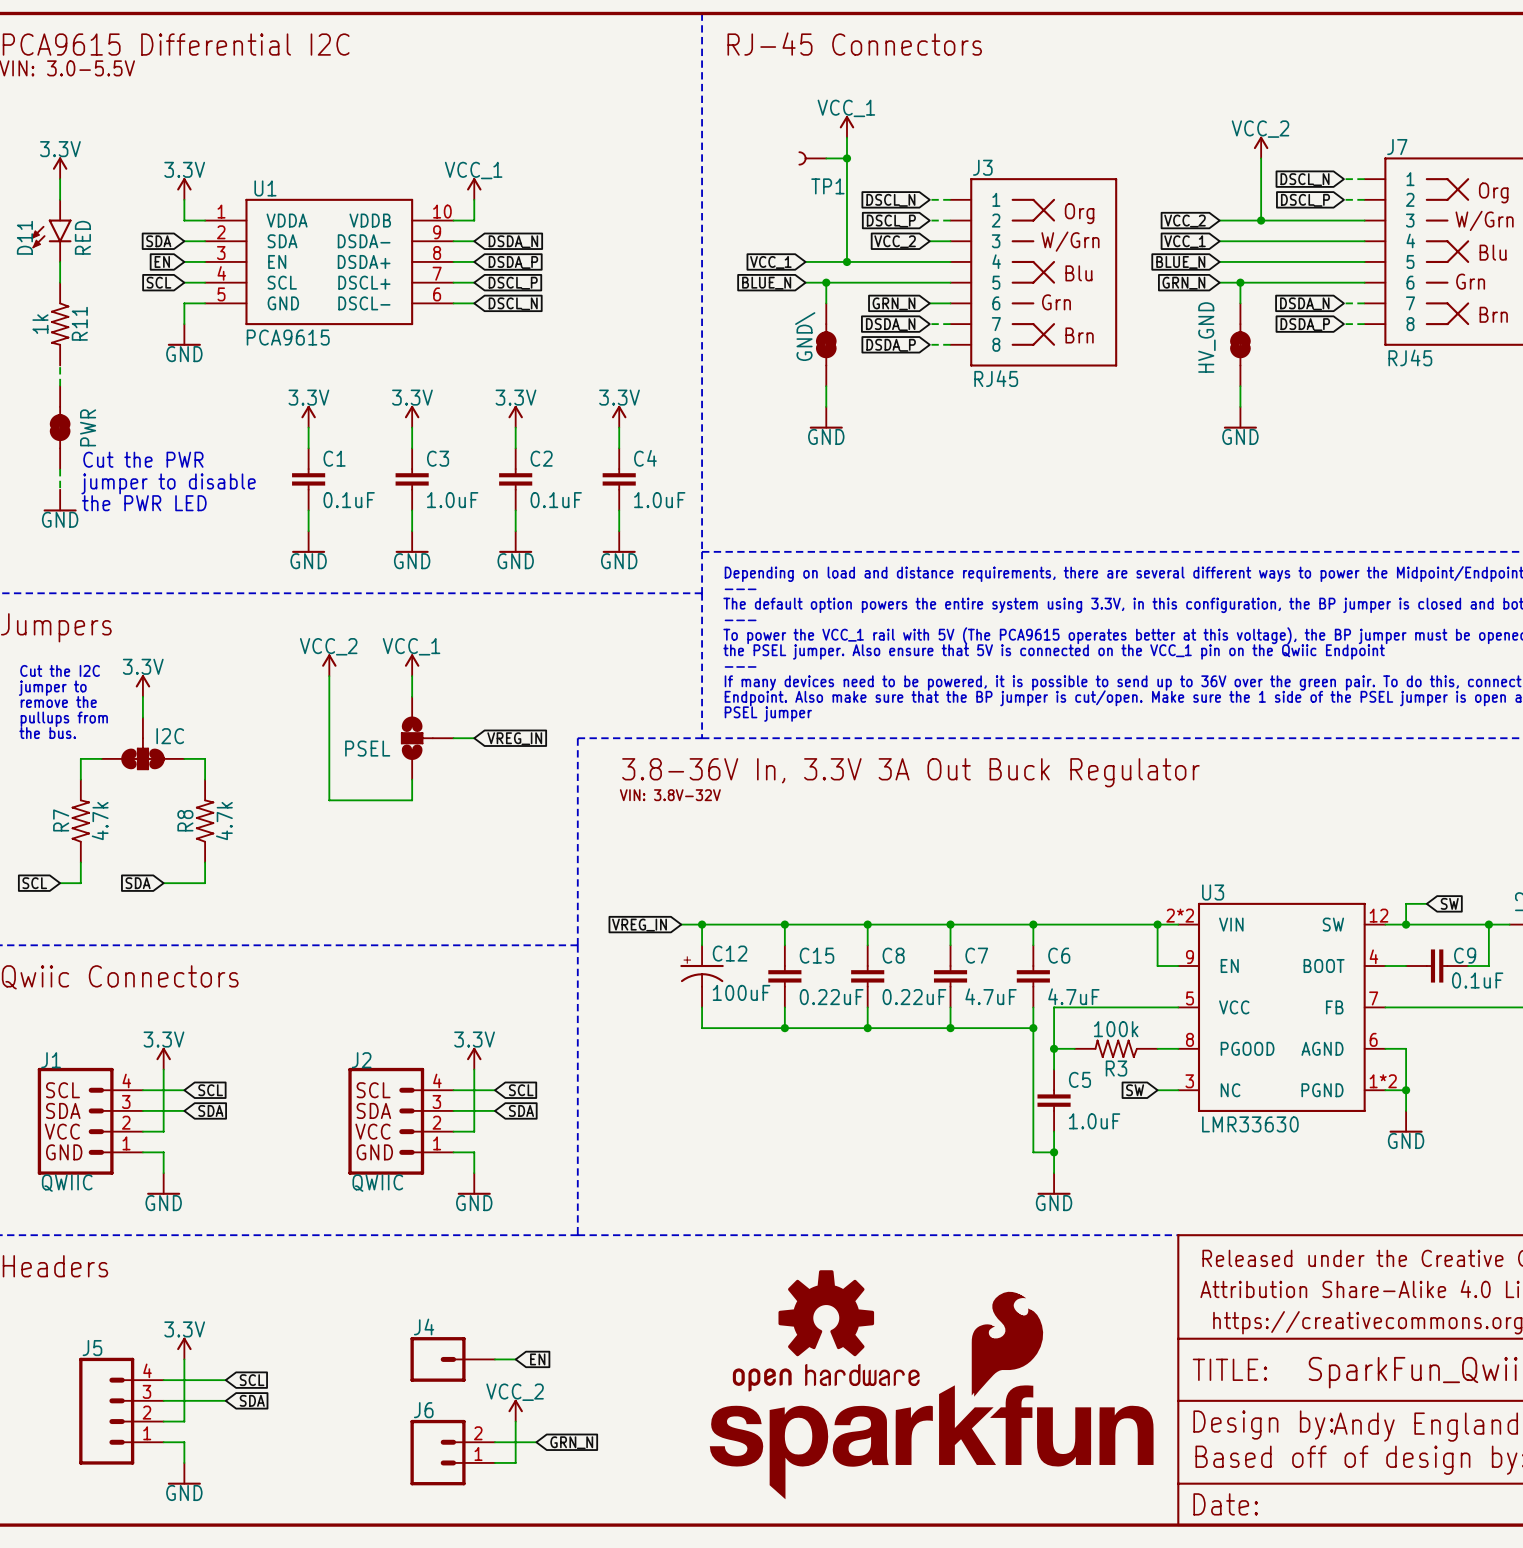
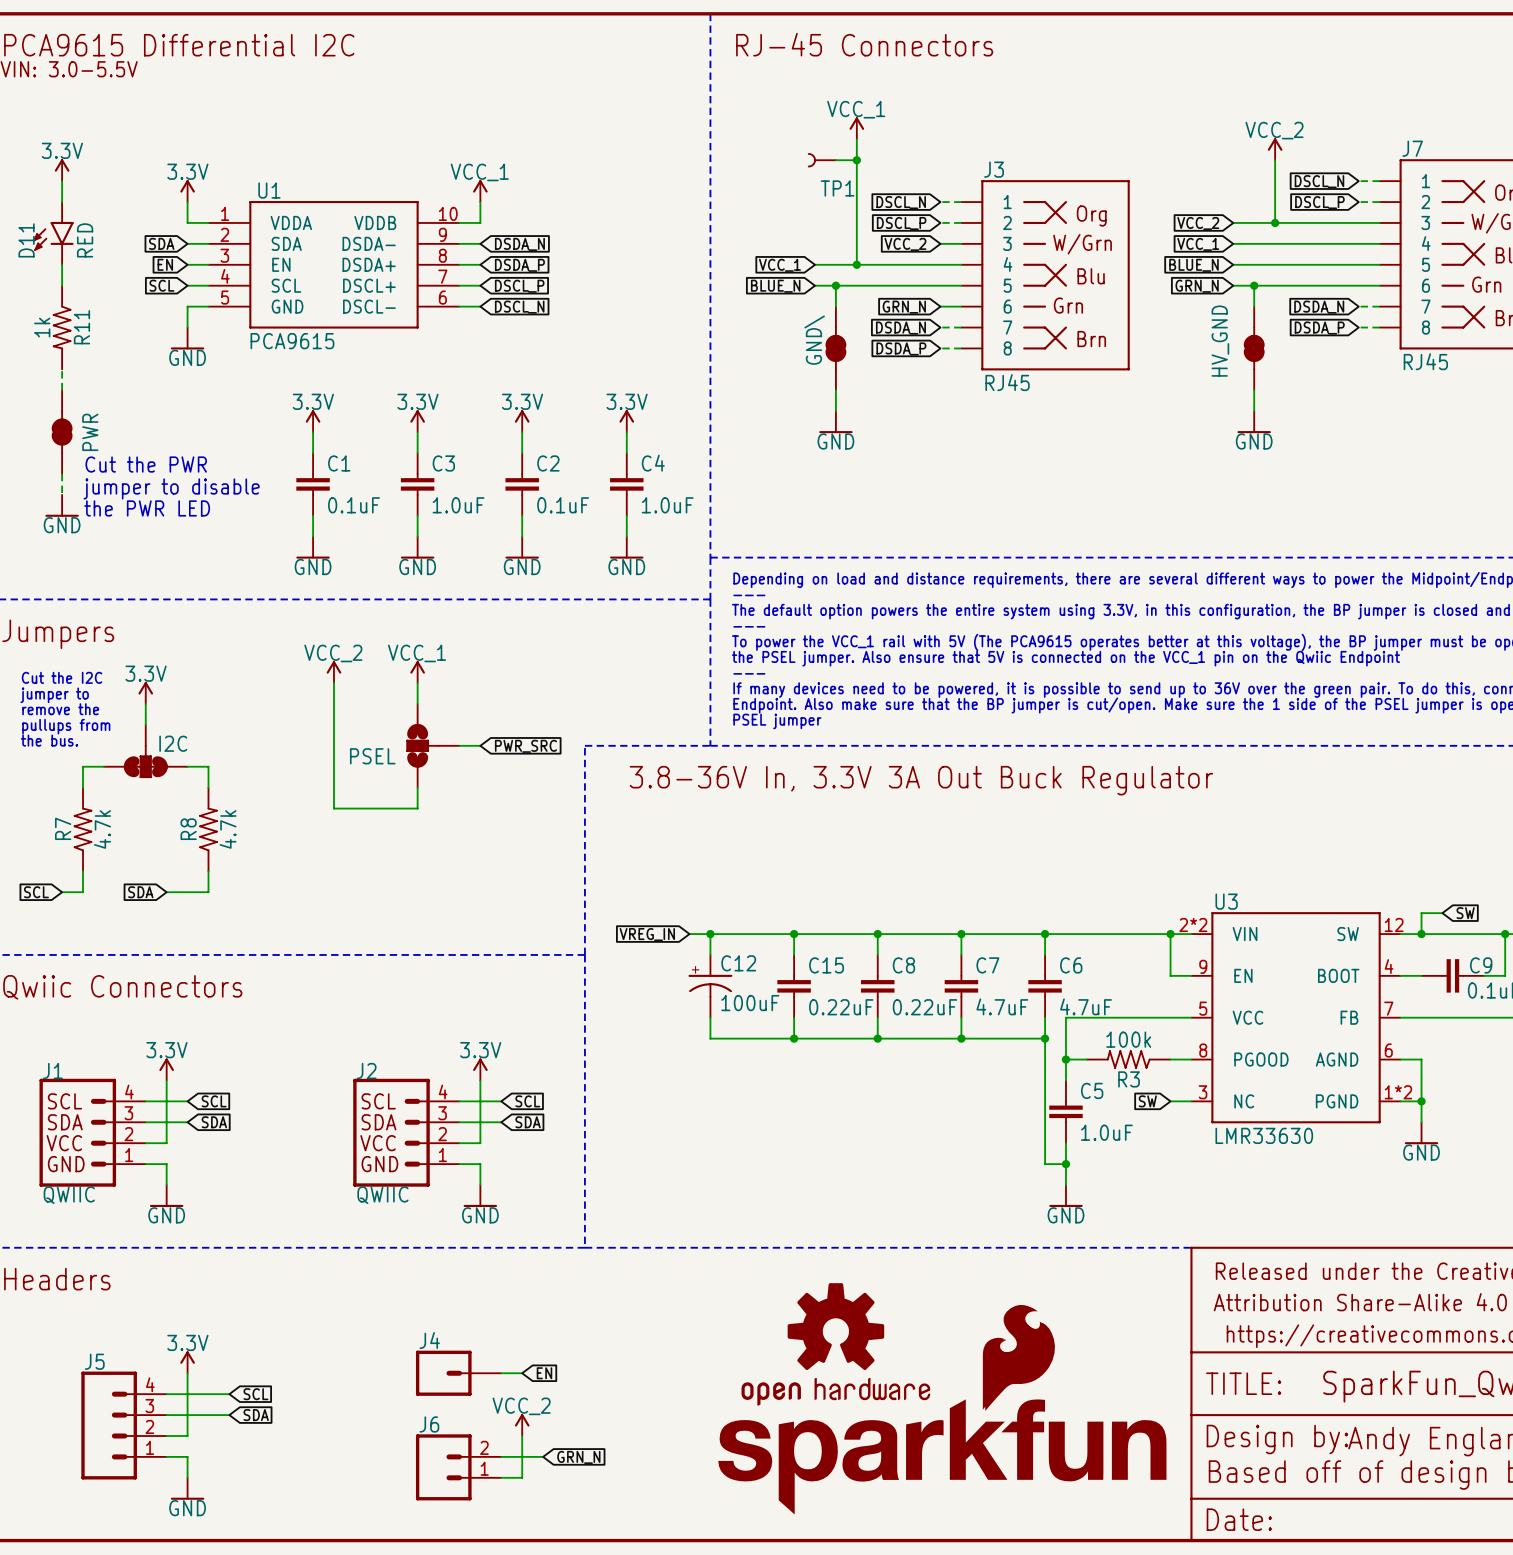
global label: VREG_IN (514, 738) -> PWR_SRC (525, 746)
text: VIN: 3.8V-32V (670, 795) -> none

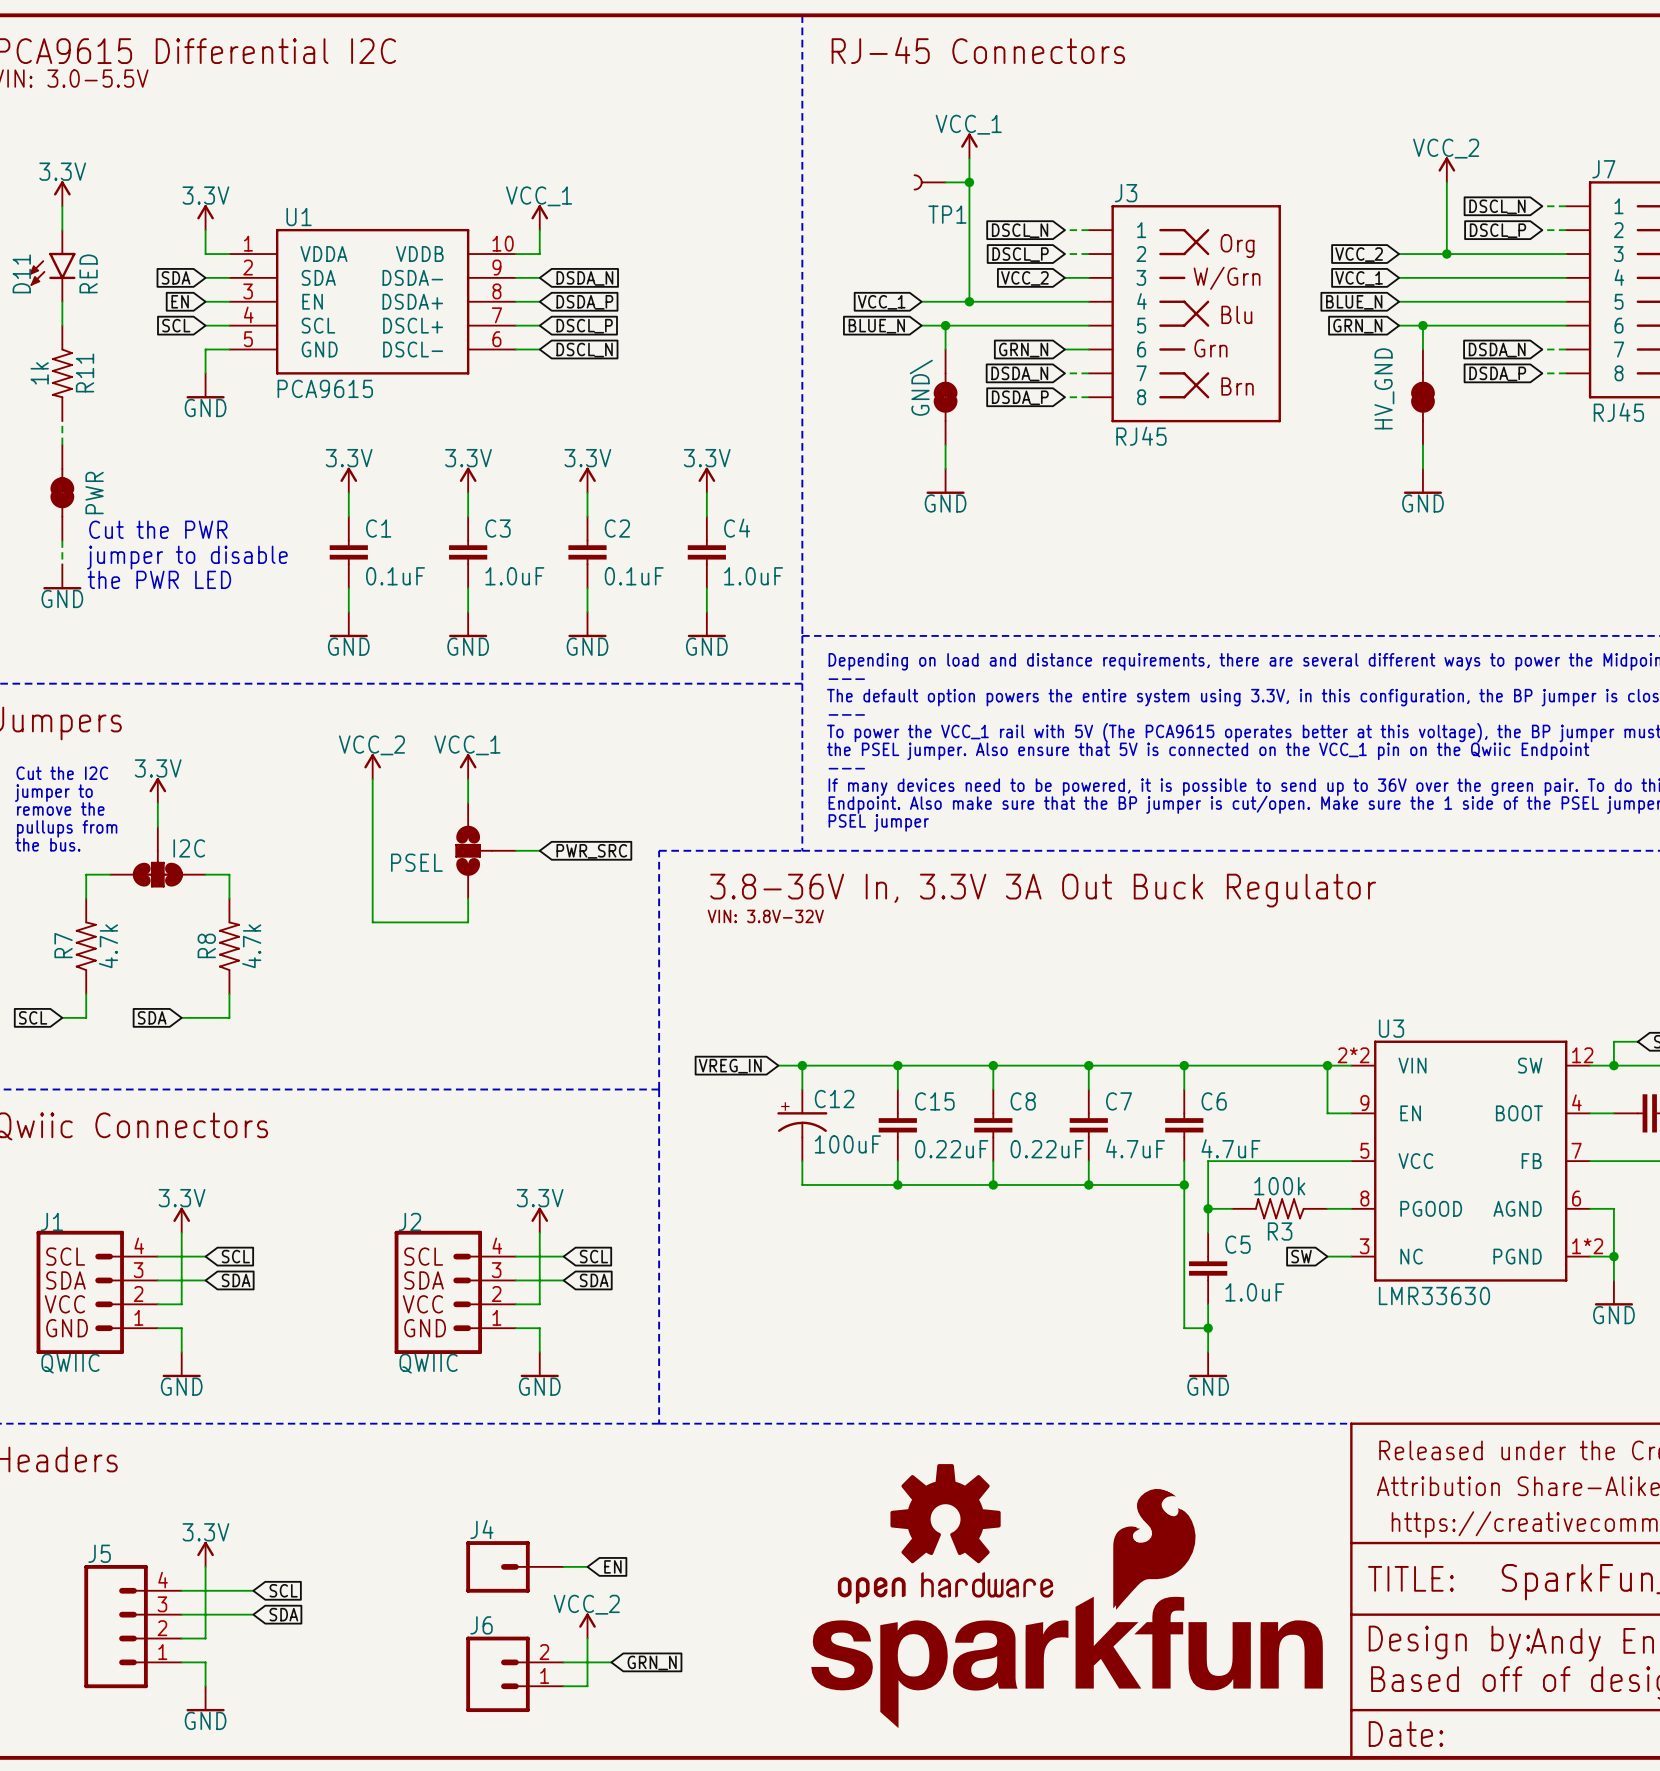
text: none -> VIN: 3.8V-32V (765, 916)

